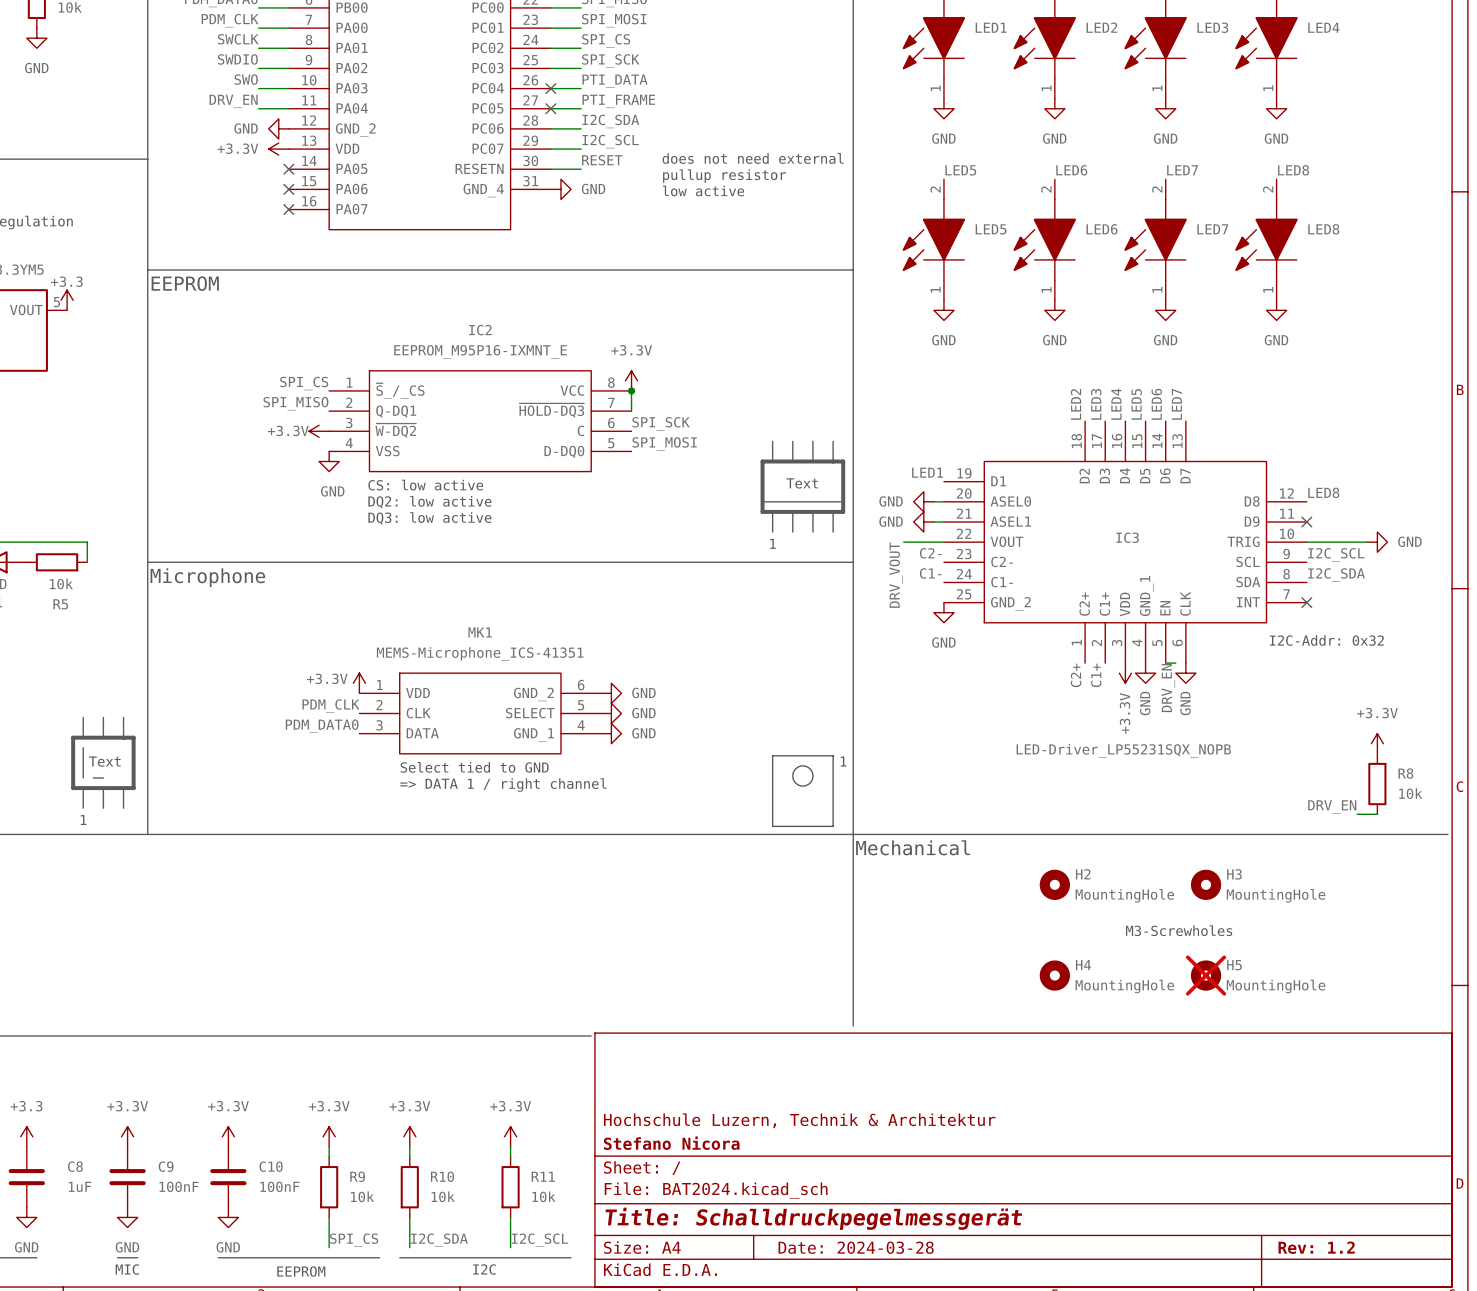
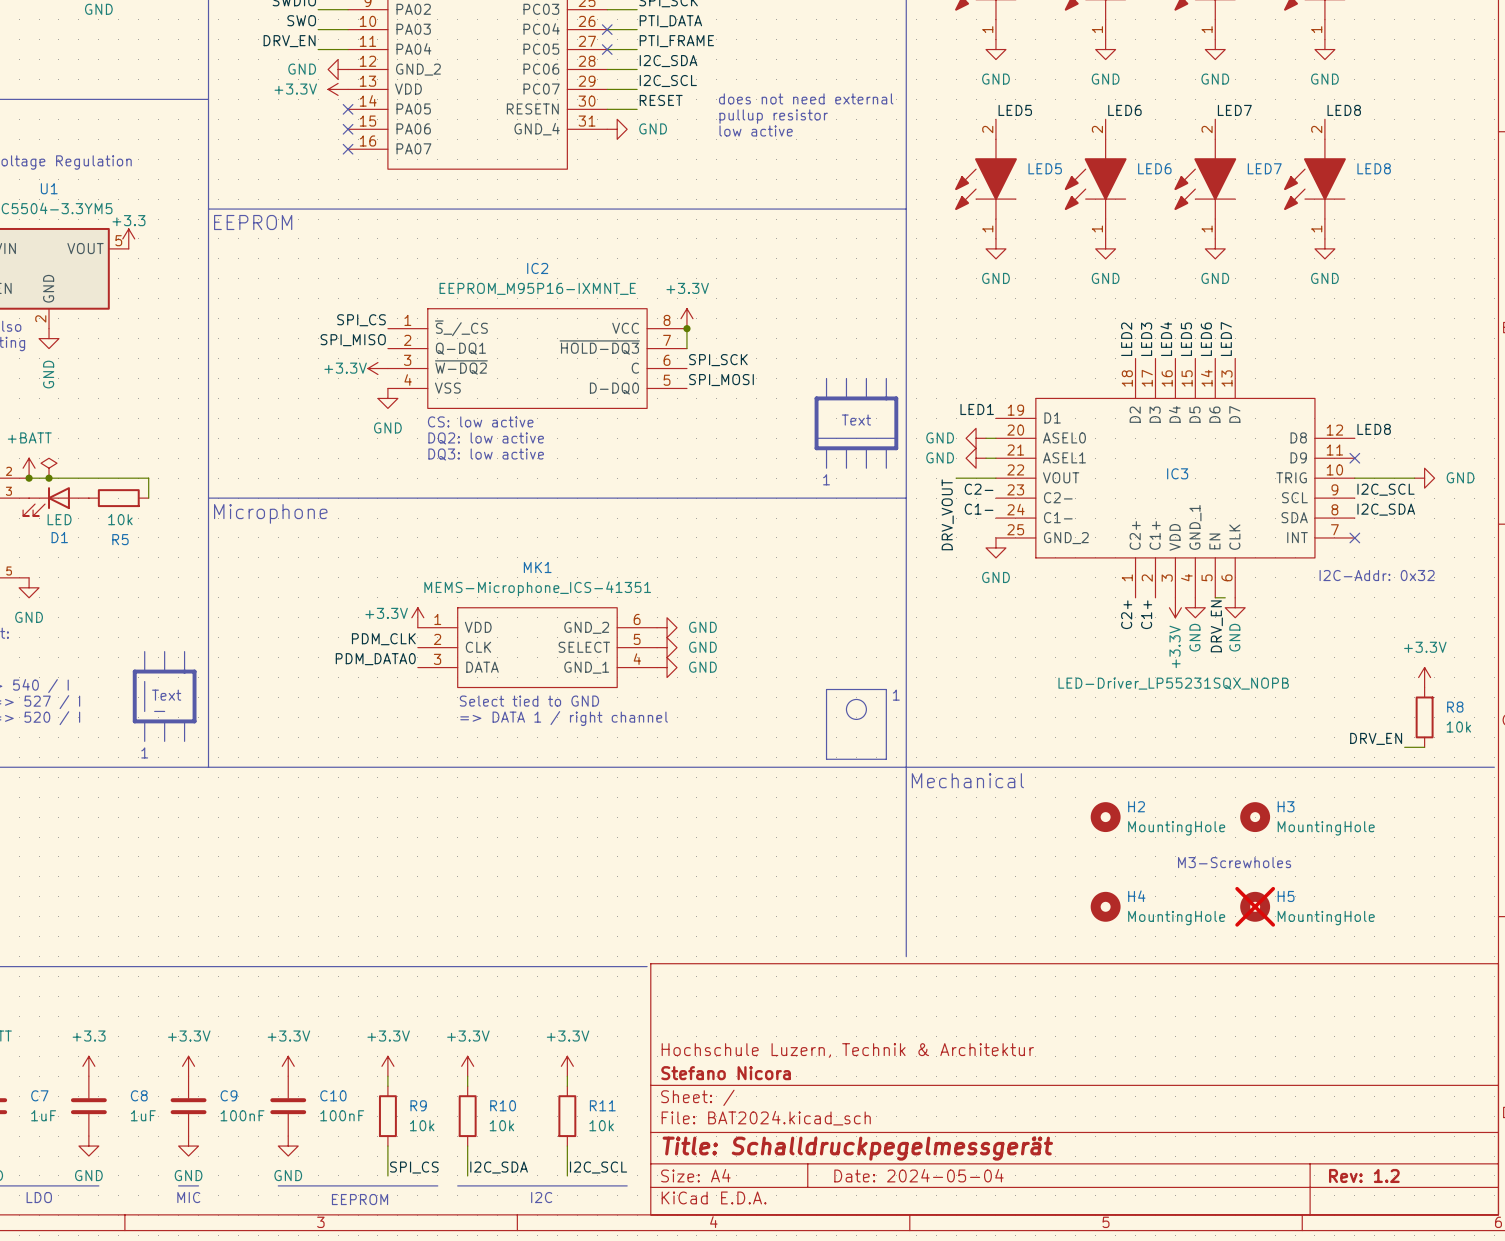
title block: Date: 2024-03-28 (856, 1247) -> Date: 2024-05-04 (919, 1175)

